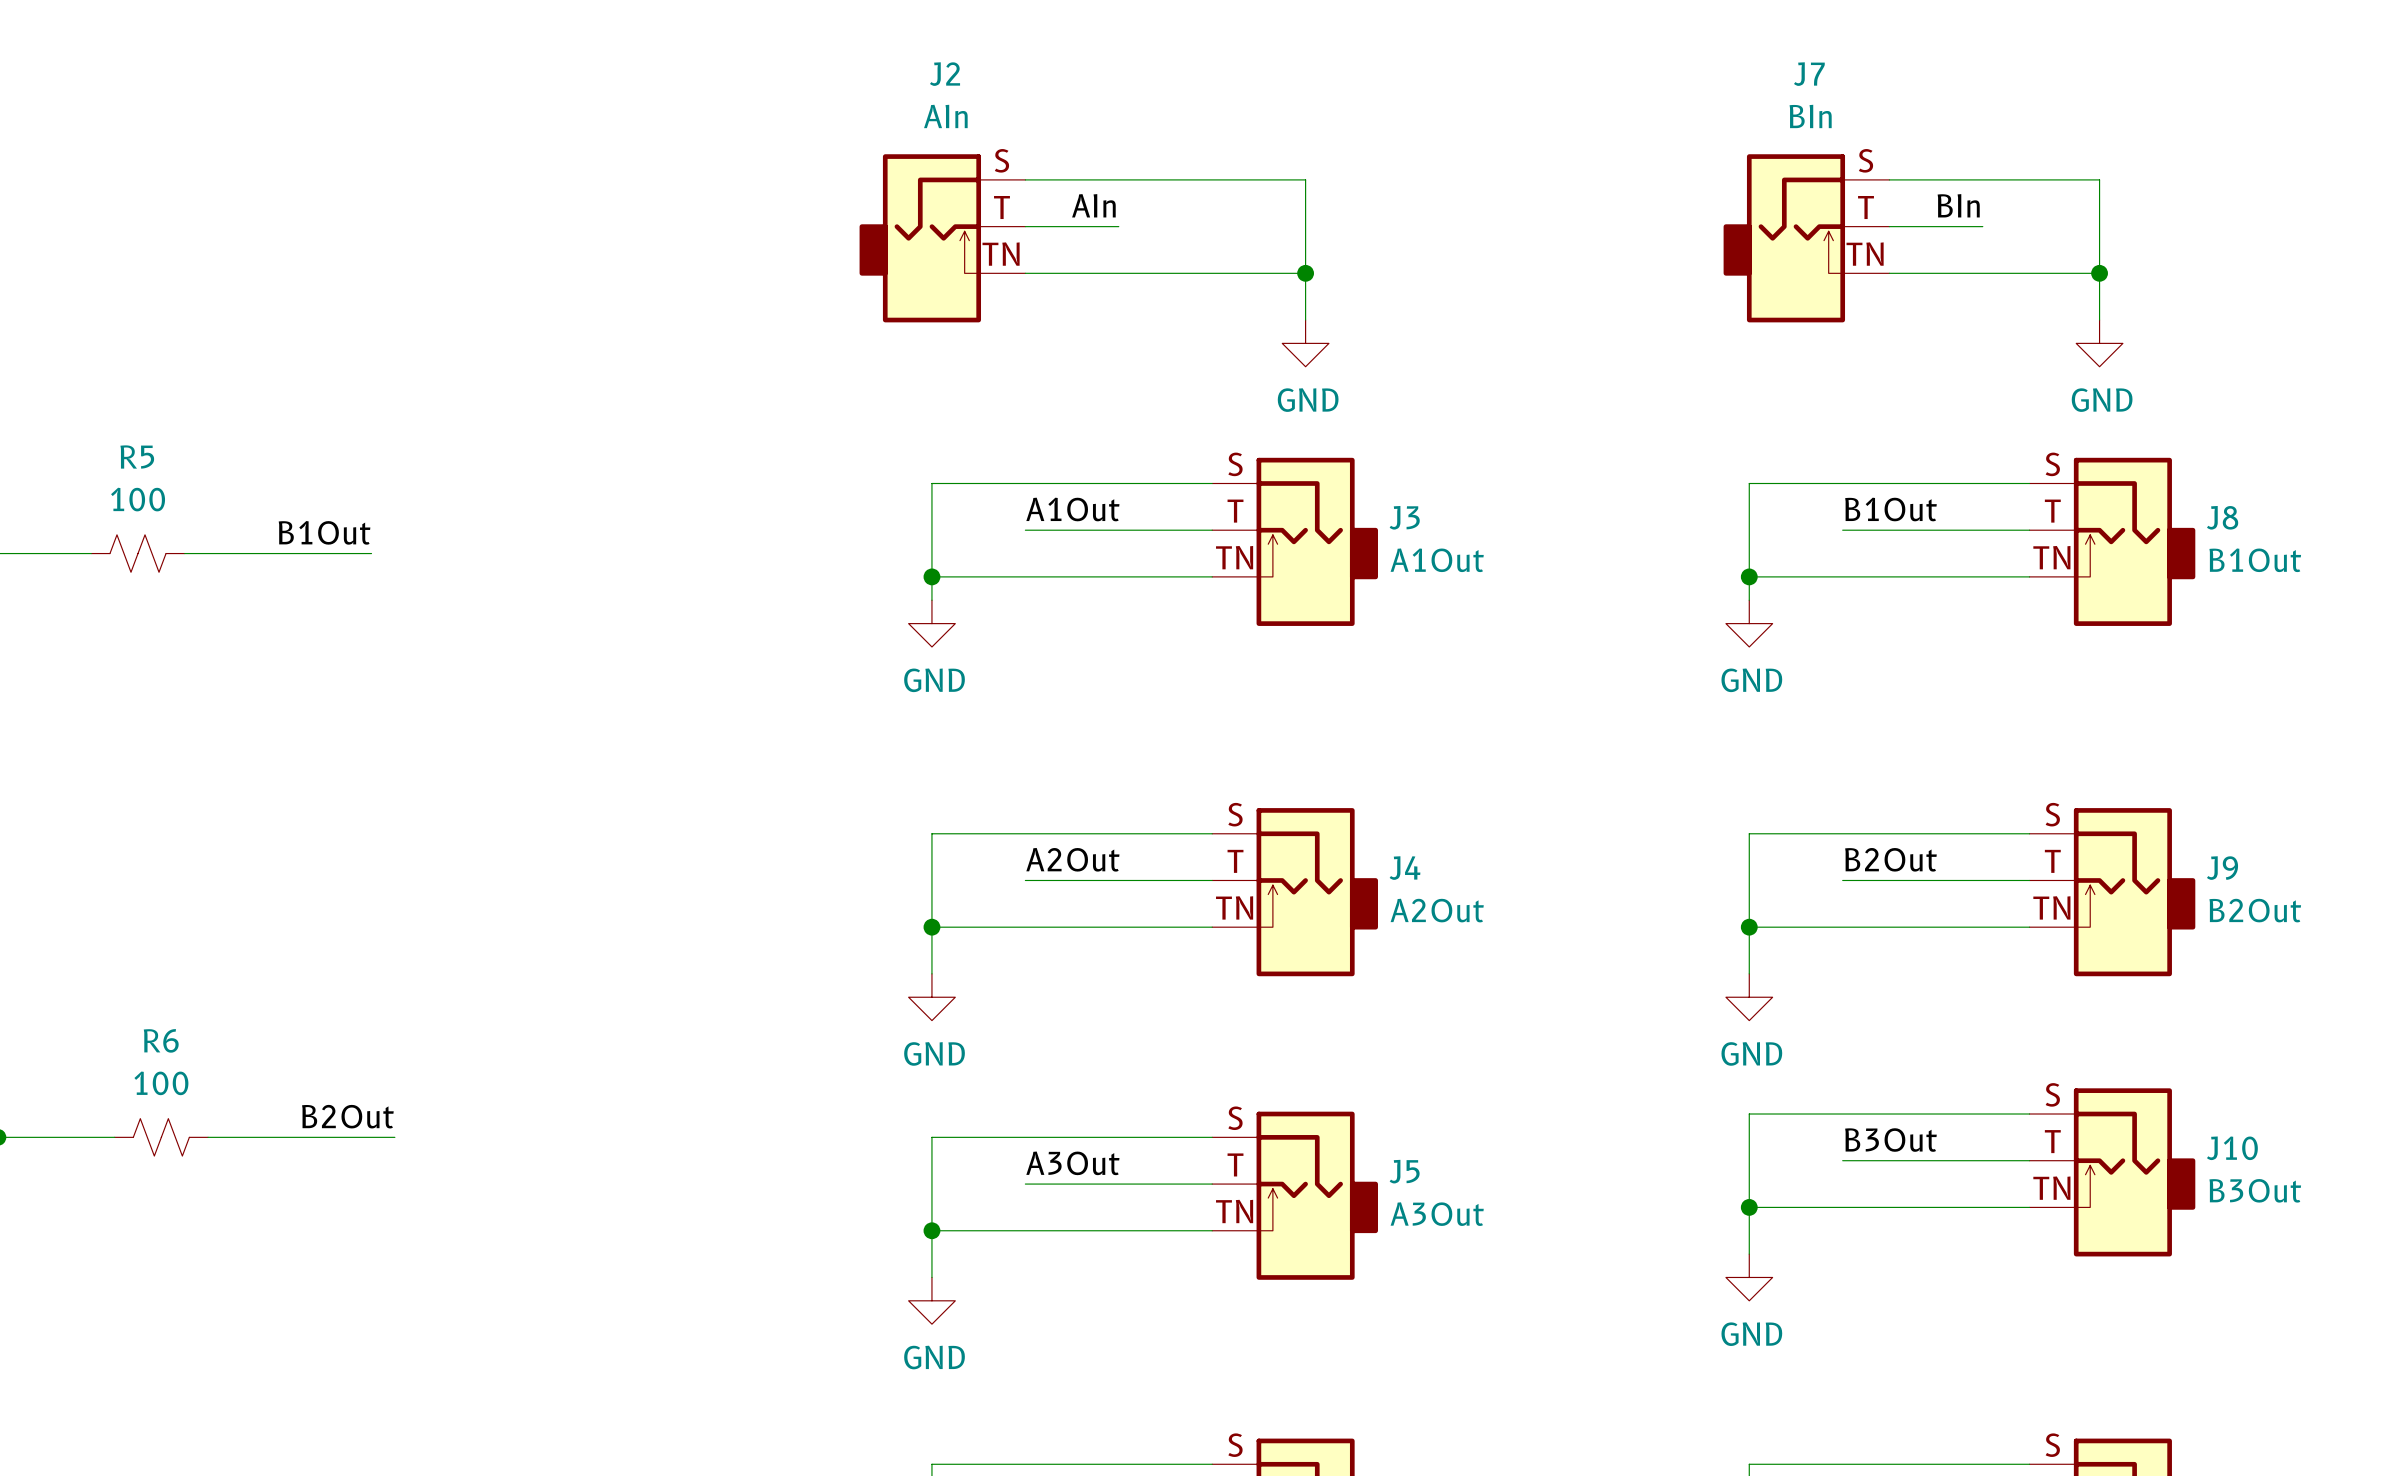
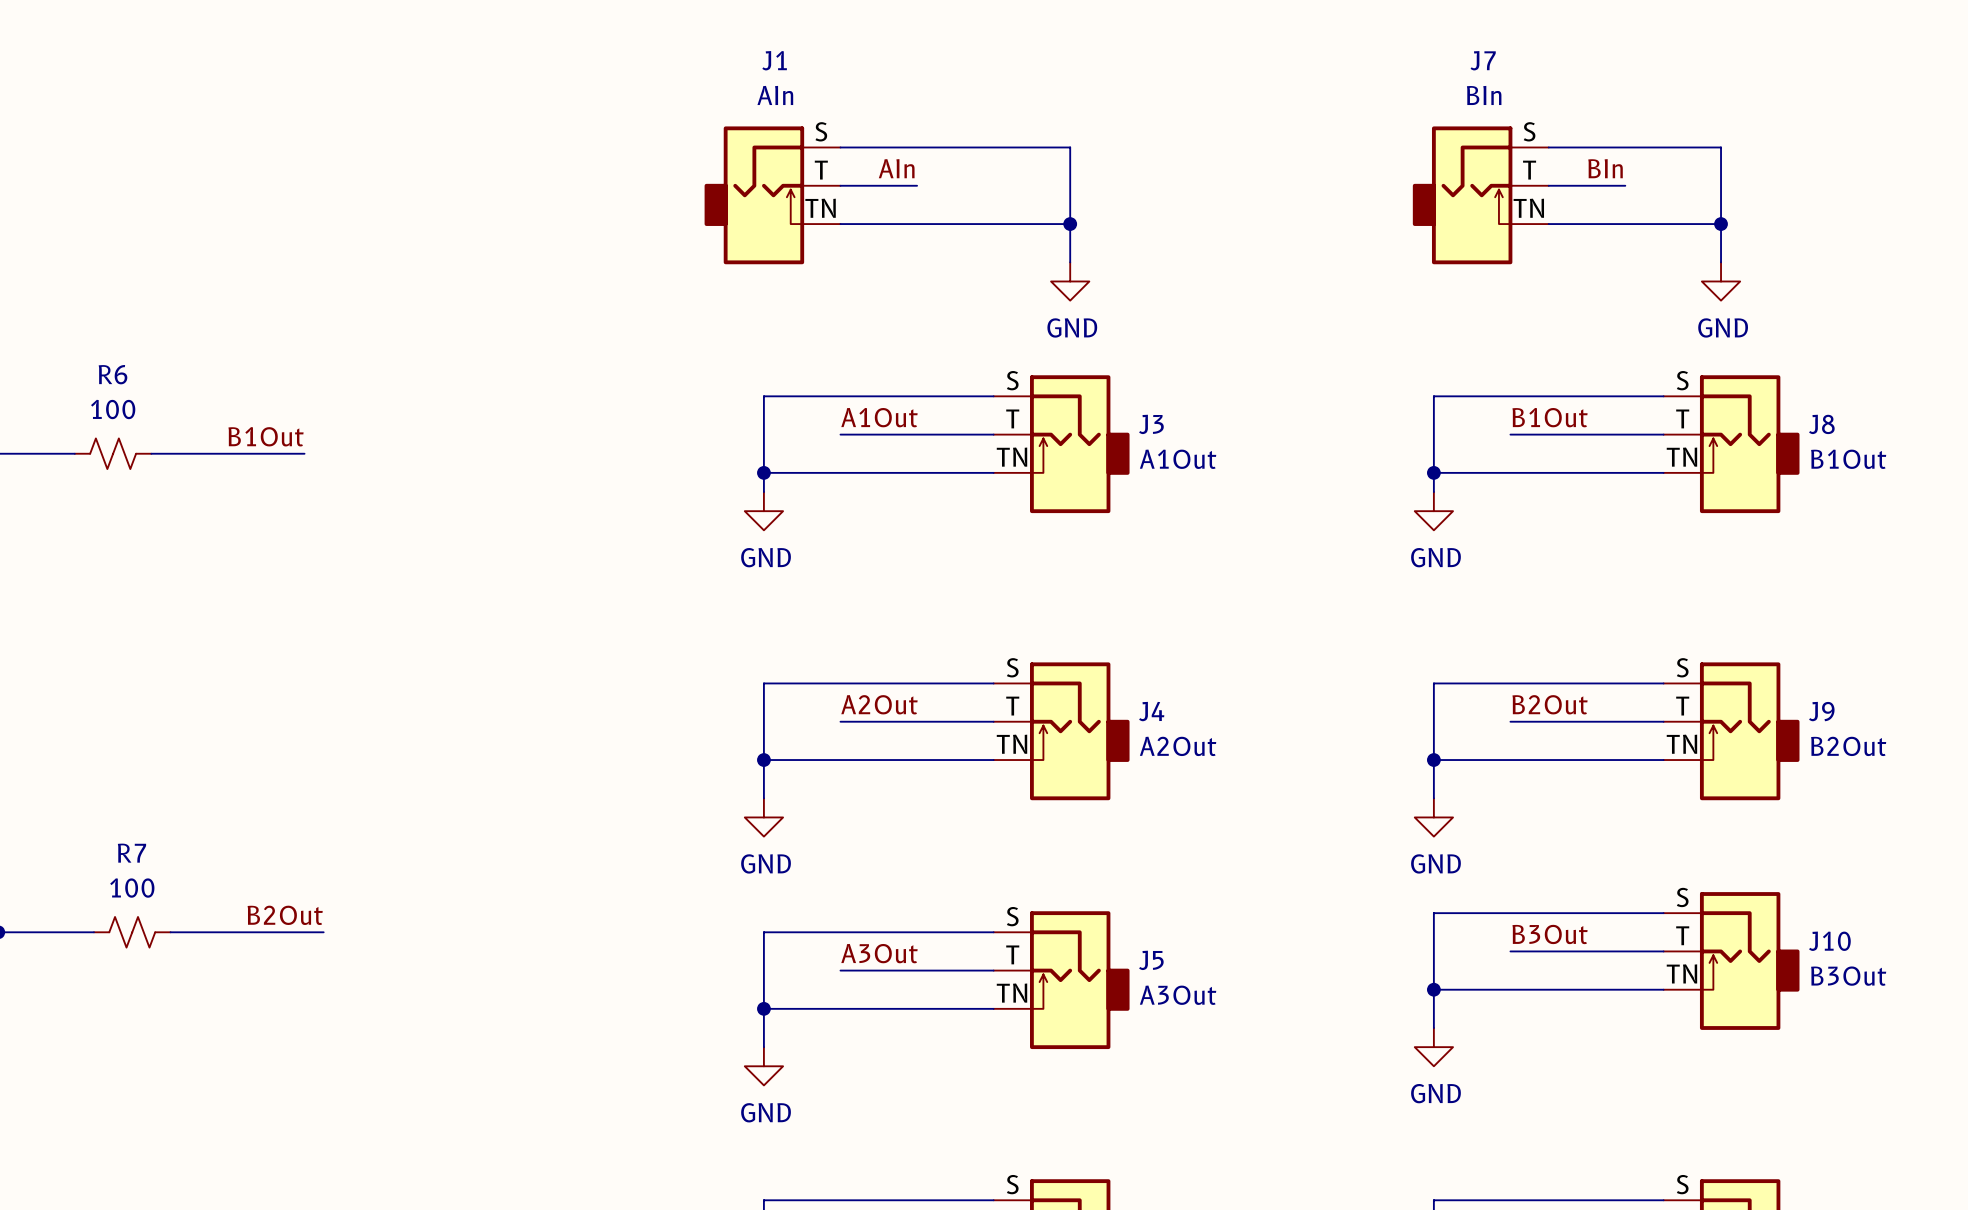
J2 name: J2 (945, 74) -> J1 (774, 60)
R5 name: R5 (137, 457) -> R6 (113, 374)
R6 name: R6 (161, 1040) -> R7 (131, 853)

